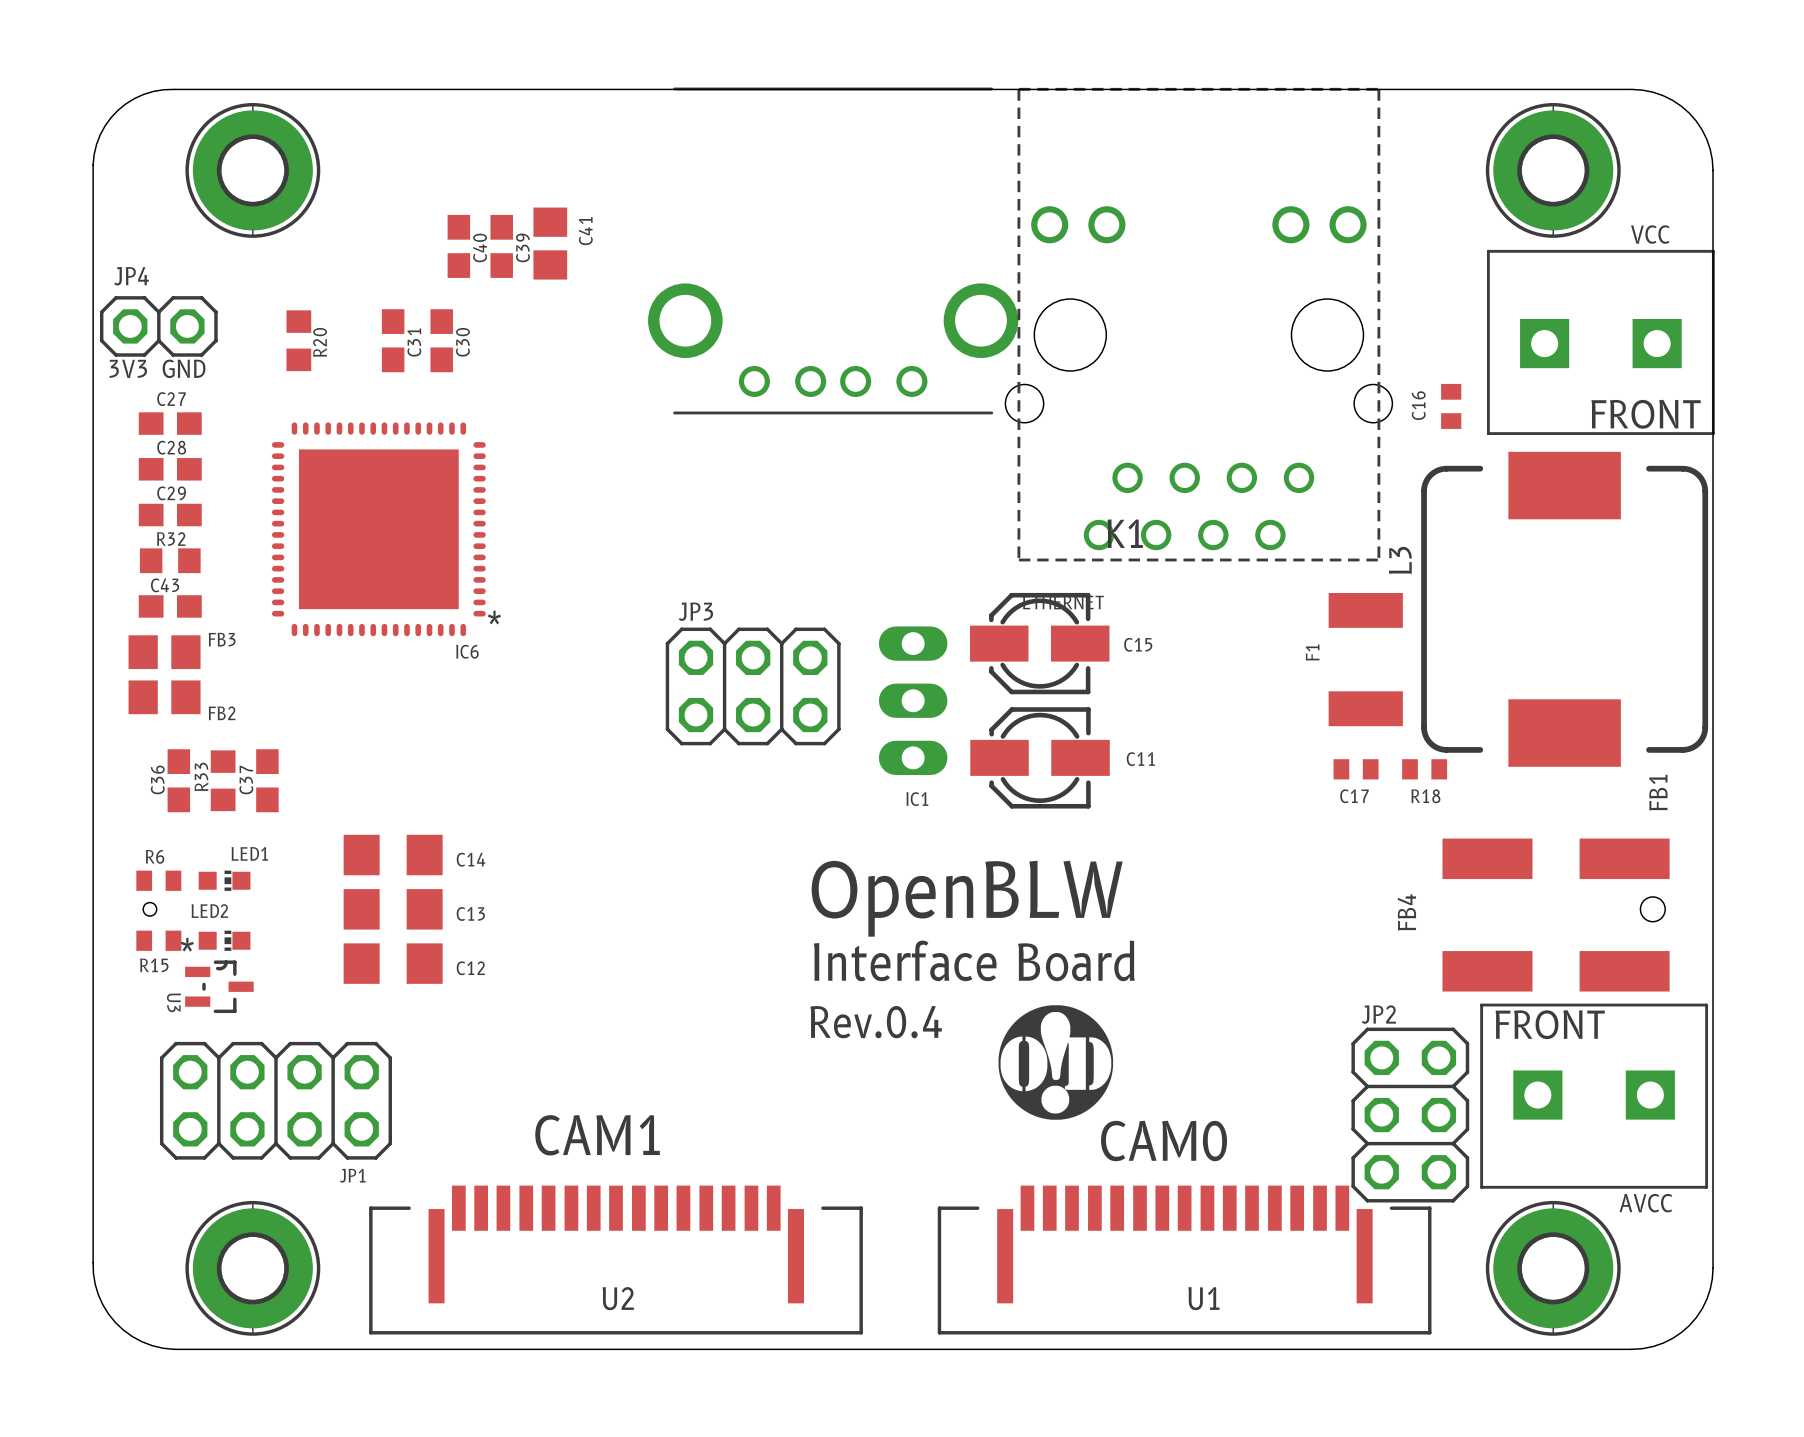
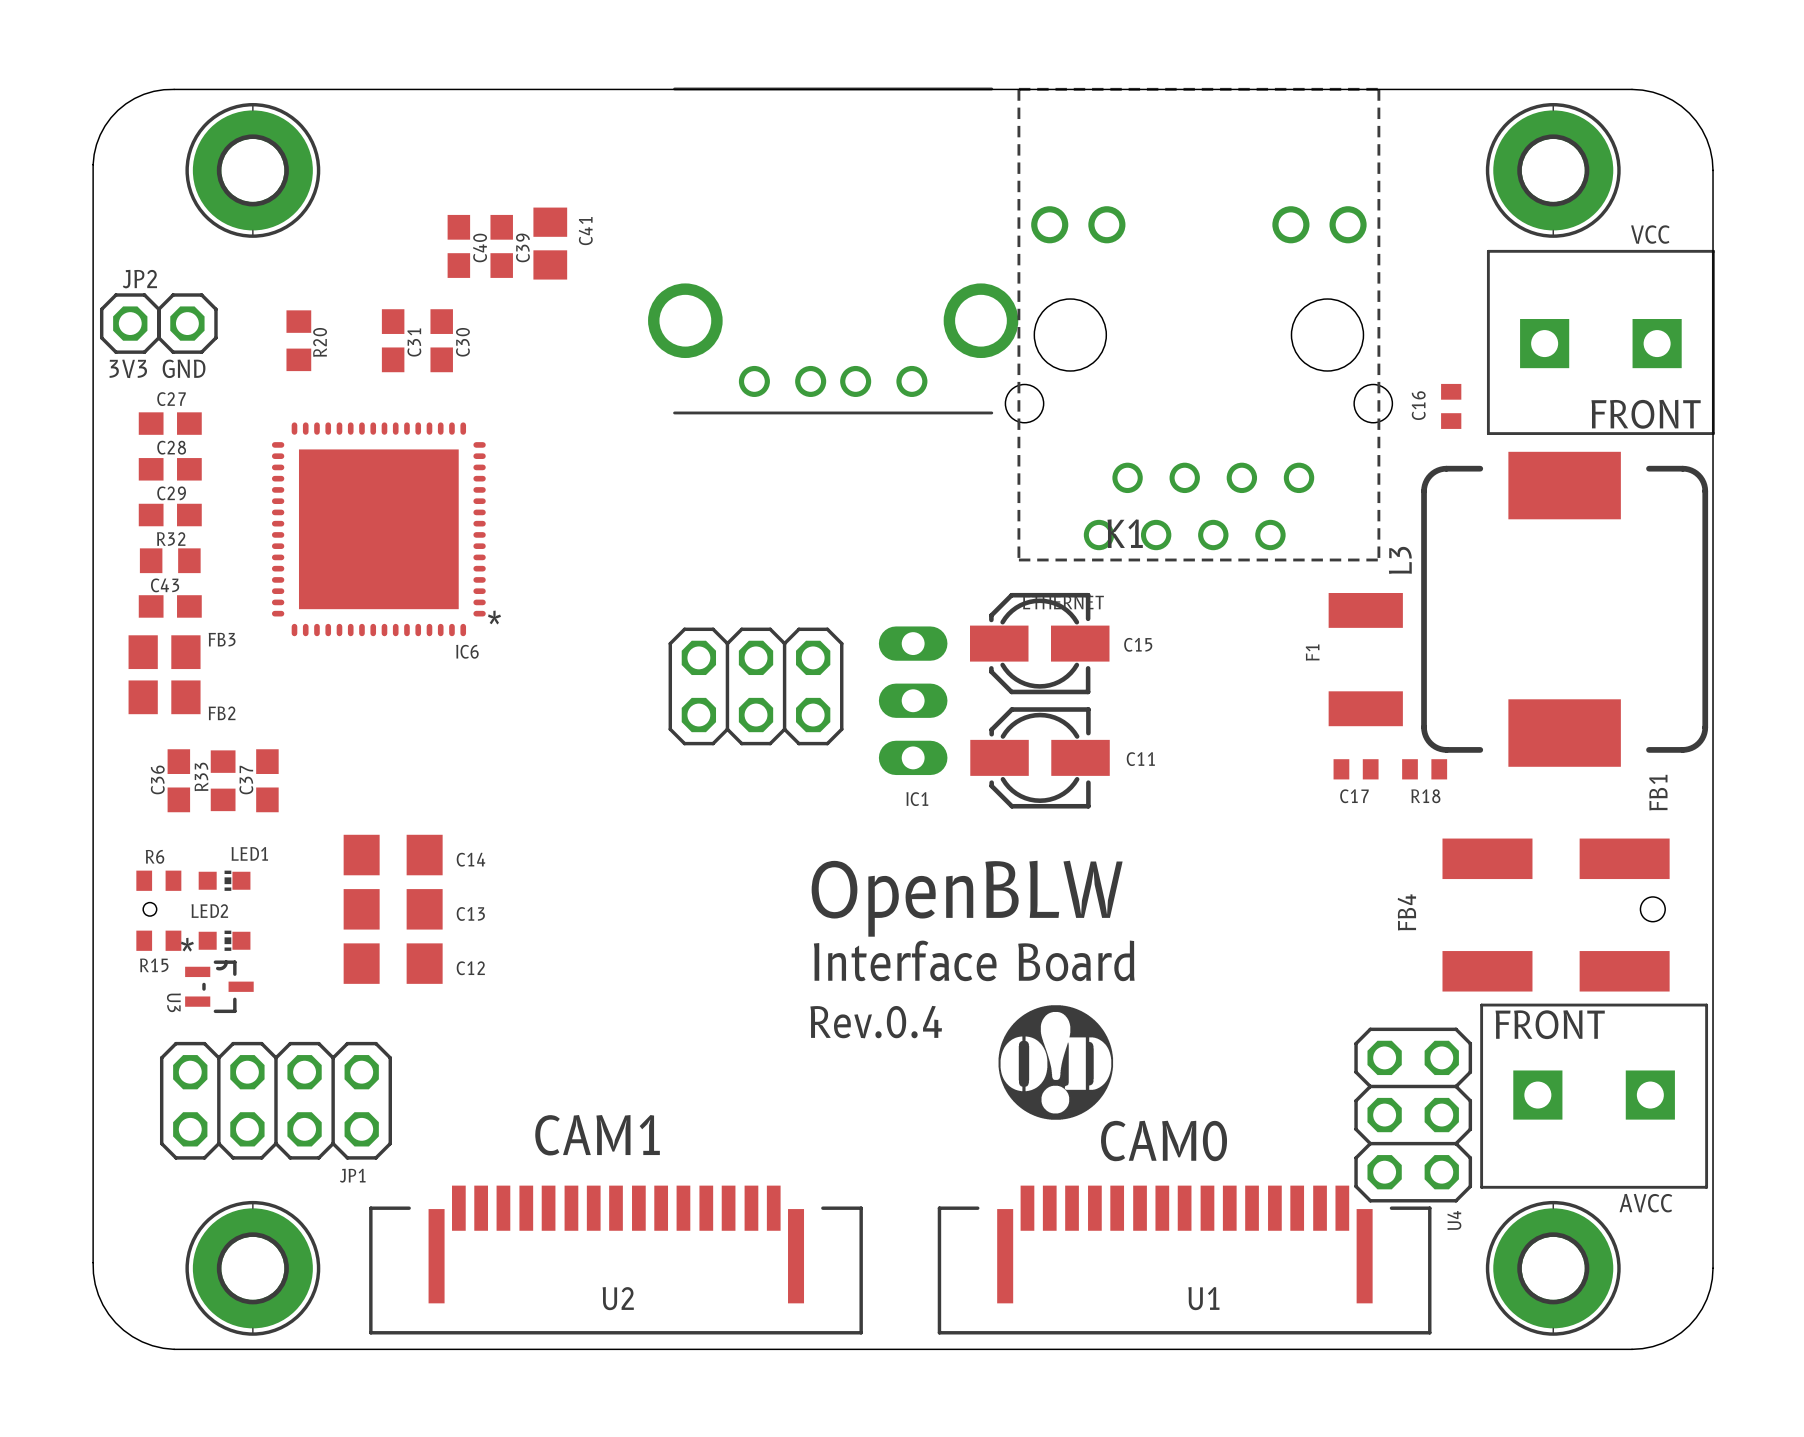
part: none -> (187, 323)
JP4: (158, 326) -> none
JP3: (753, 686) -> none
U4: none -> (1070, 915)
JP2 name position: JP2 (1378, 1014) -> JP2 (139, 279)
JP2 footprint: [1351, 1027, 1470, 1203] -> [99, 293, 161, 354]

